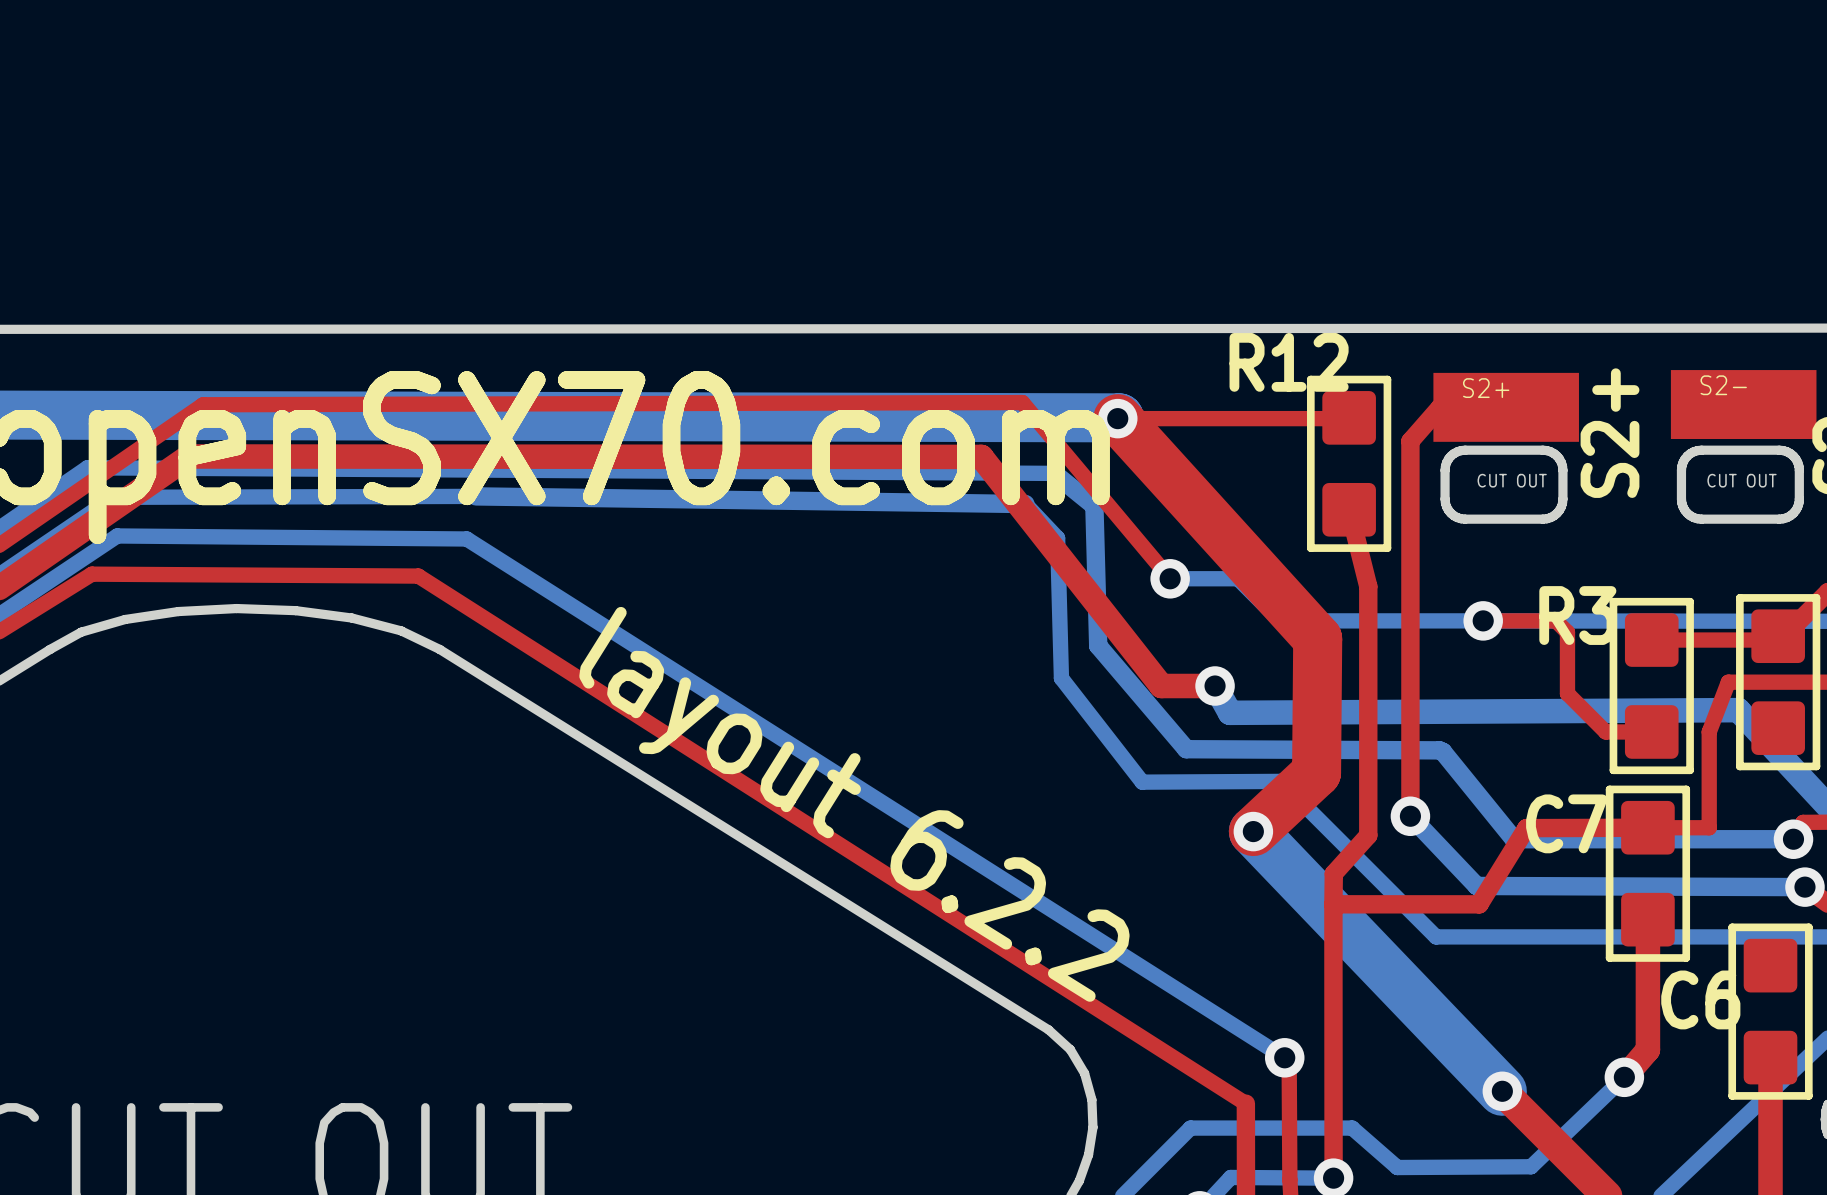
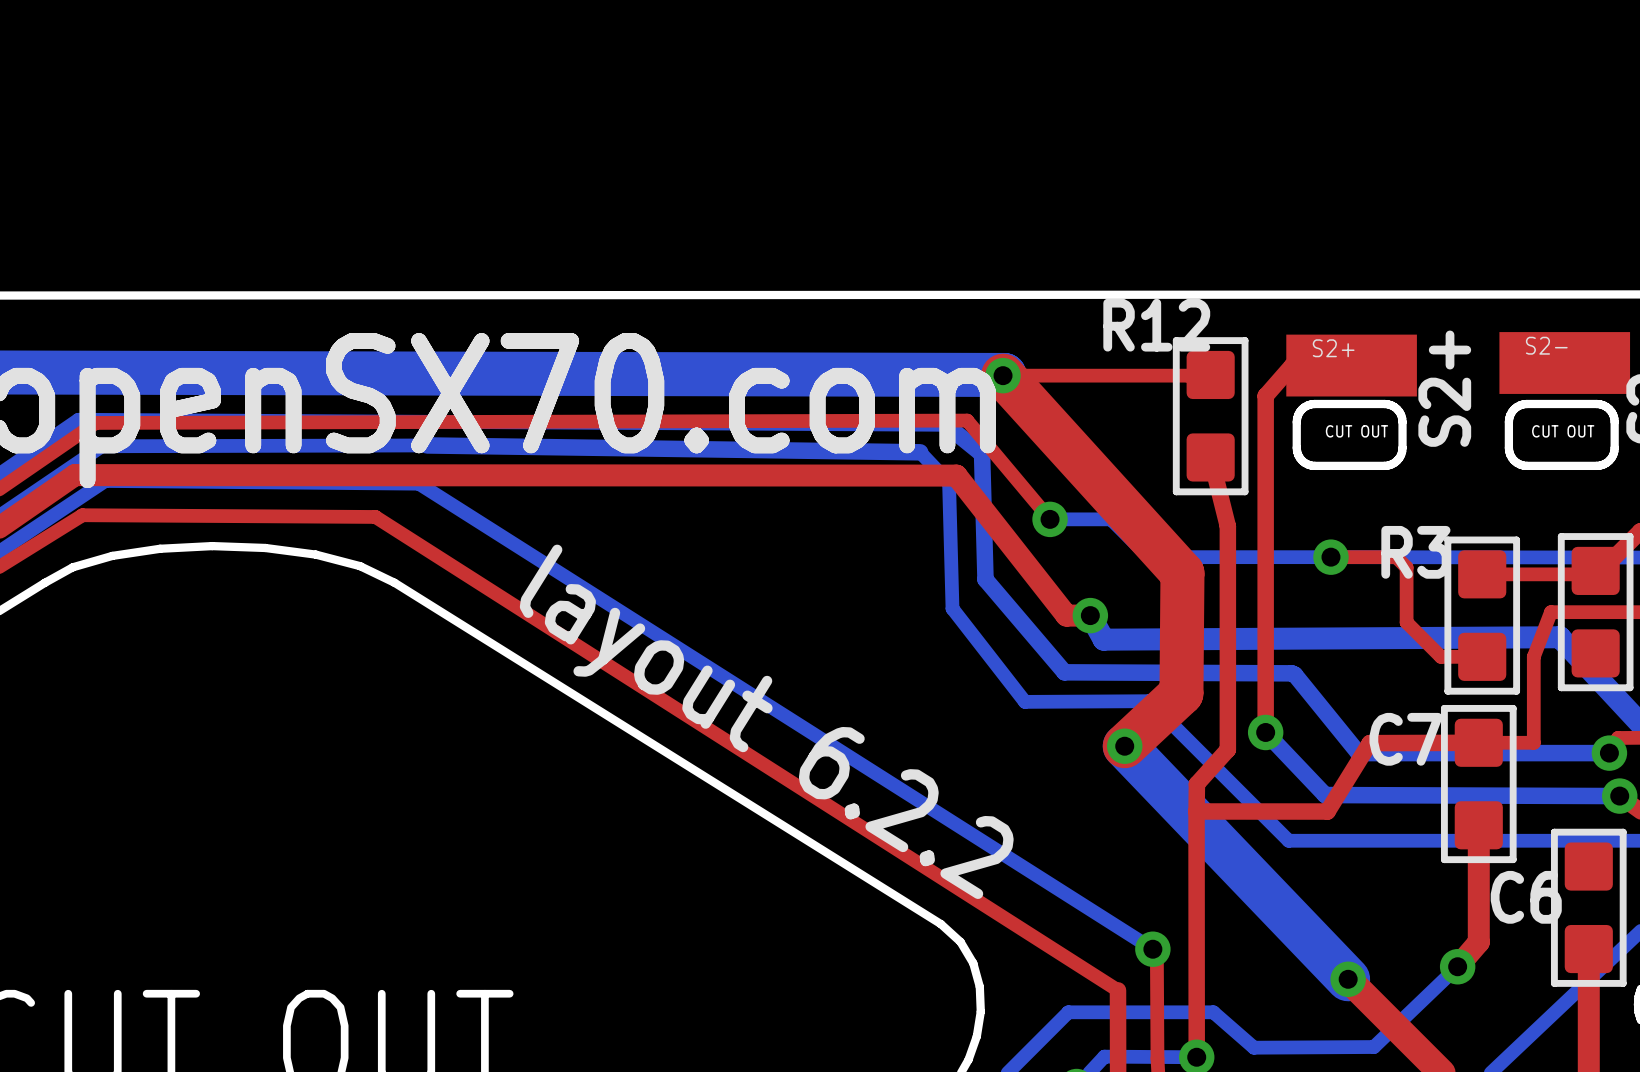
top track: (1077, 468) (1022, 402) (203, 404) (106, 471) -> (967, 420) (95, 422)
top track: (83, 529) (188, 456) (981, 456) (1161, 686) (1188, 686) -> (75, 475) (956, 475) (1066, 615)

